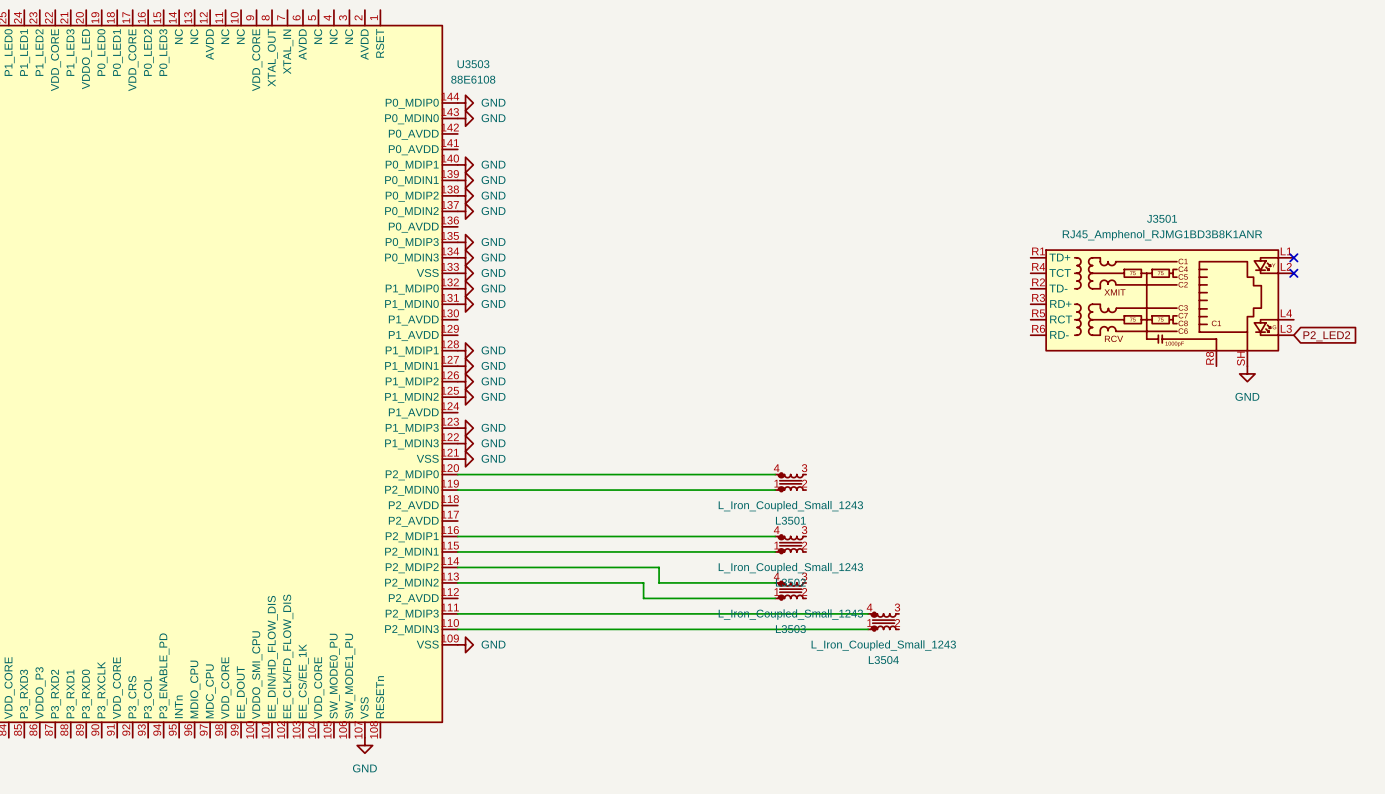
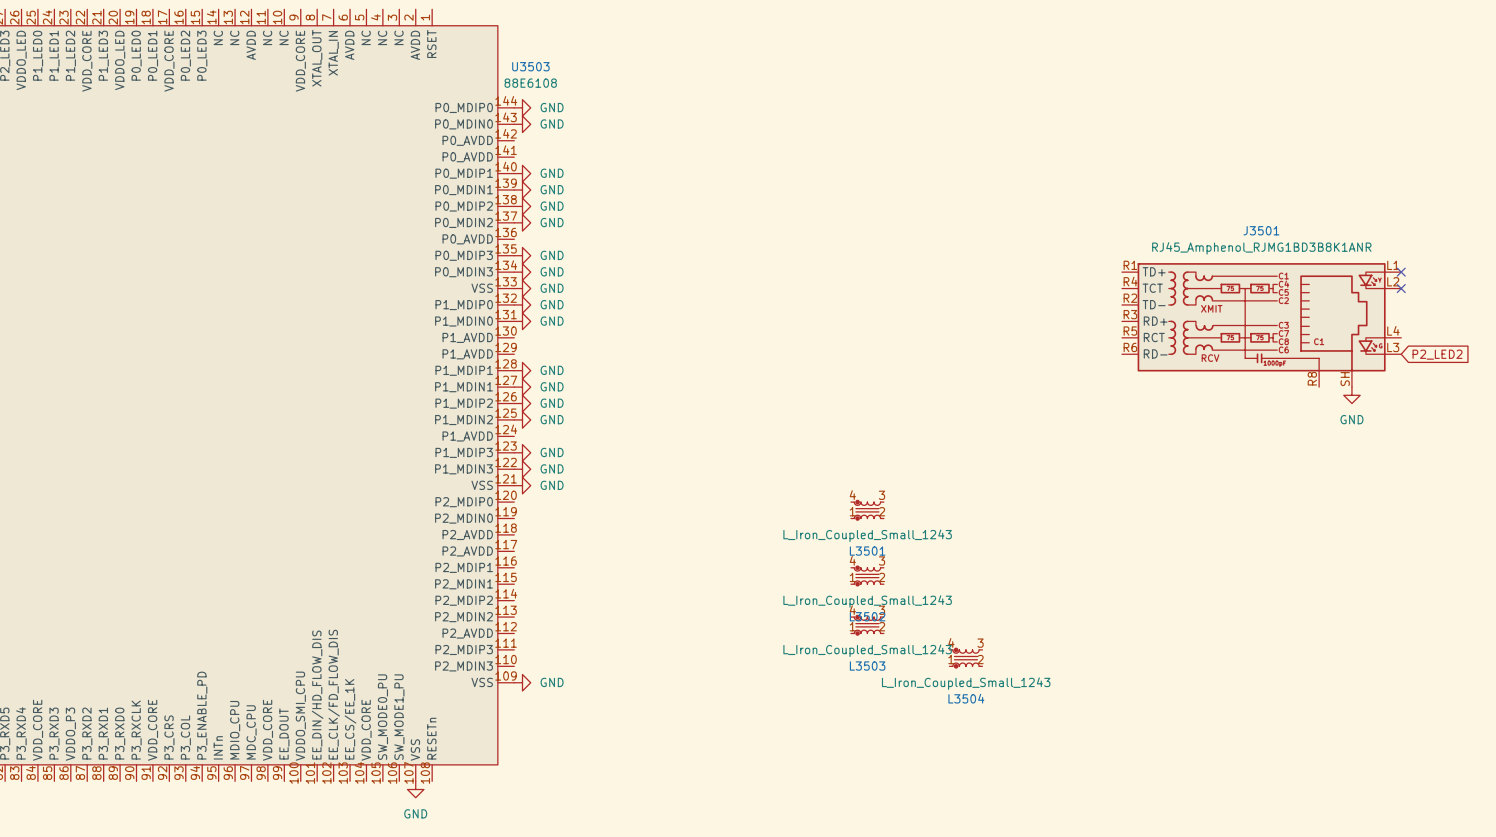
wire: (457, 474) (775, 474) -> none
wire: (457, 490) (775, 490) -> none
wire: (457, 536) (775, 536) -> none
wire: (457, 551) (775, 551) -> none
wire: (457, 567) (659, 567) (659, 582) (775, 582) -> none
wire: (457, 582) (643, 582) (643, 598) (775, 598) -> none
wire: (457, 613) (868, 613) -> none
wire: (457, 629) (868, 629) -> none

